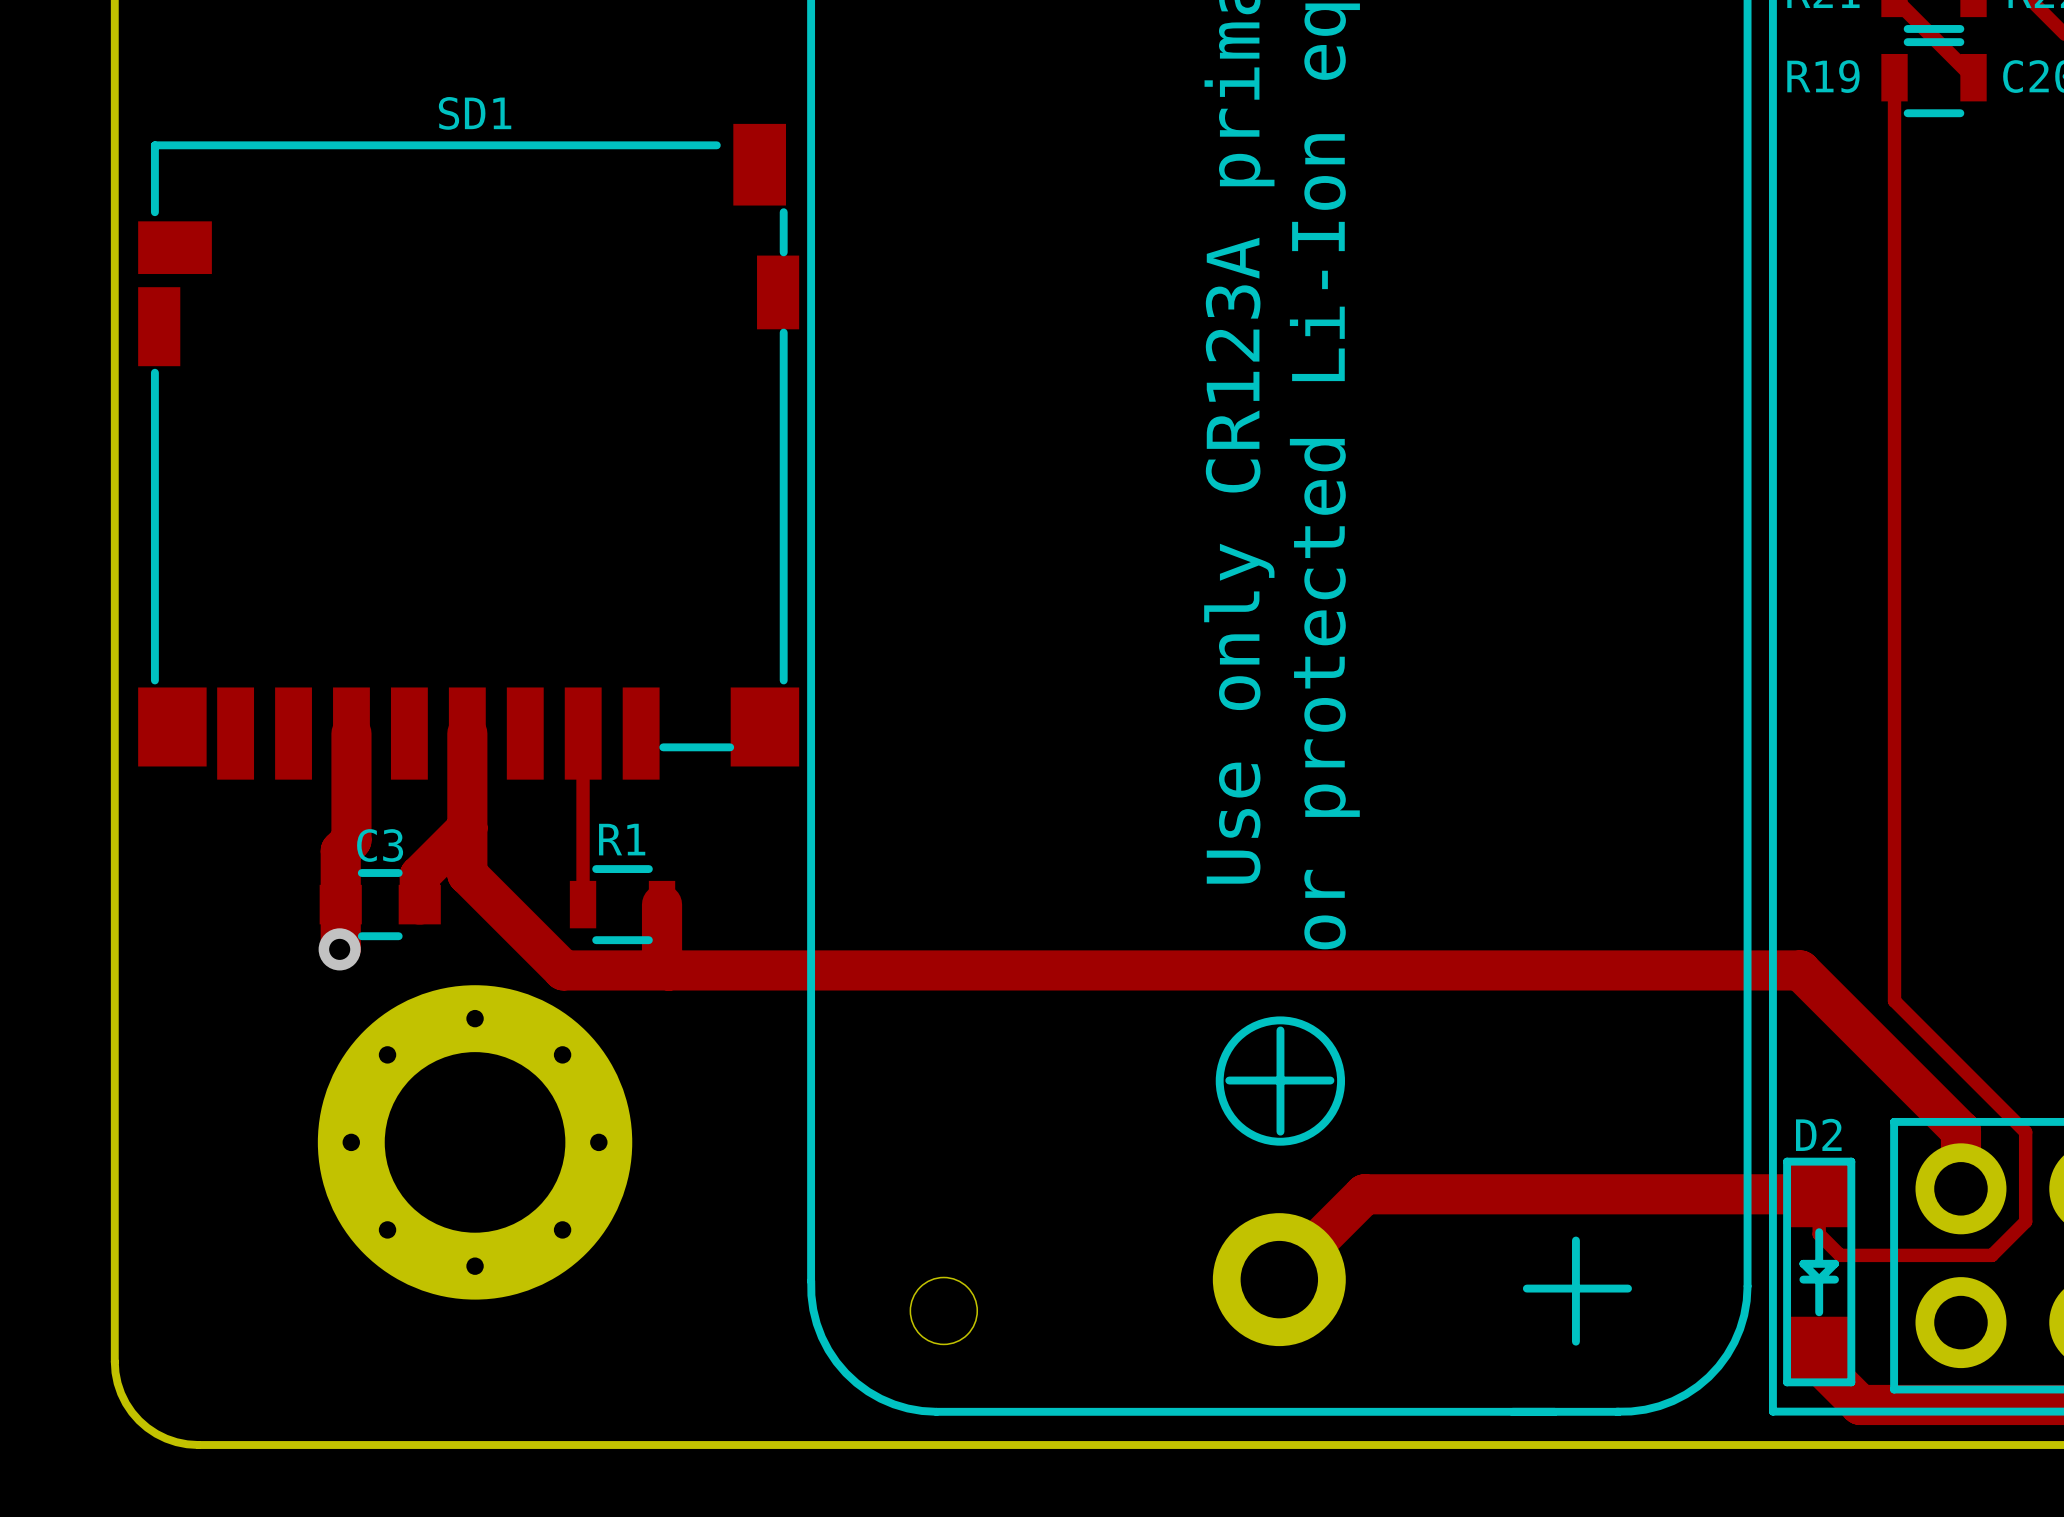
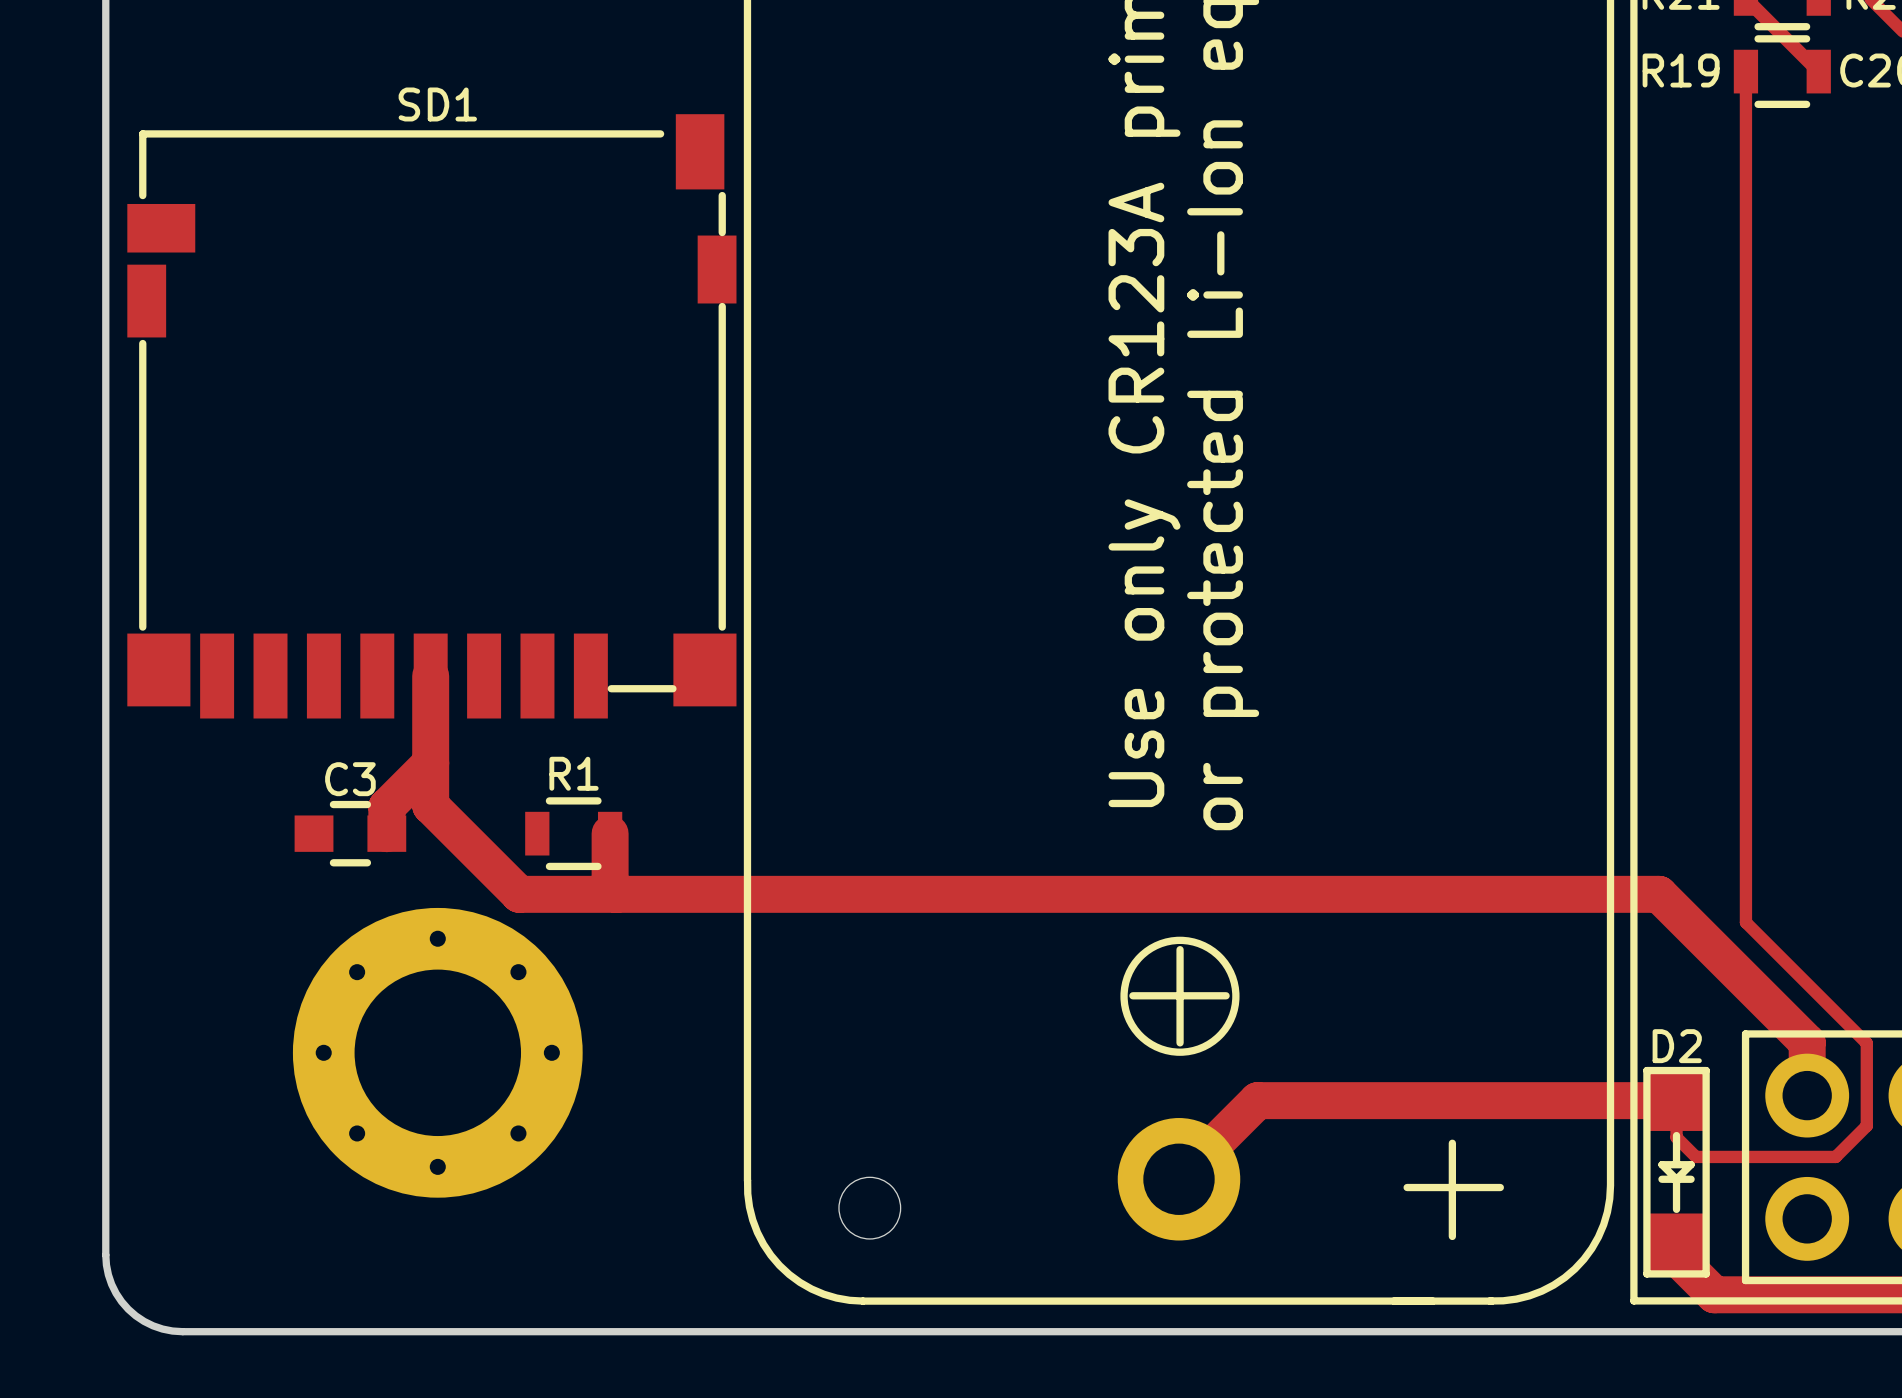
track: (351, 733) (351, 840) (340, 850) (339, 949) -> none
track: (583, 733) (583, 904) -> none
via: (339, 949) -> none

